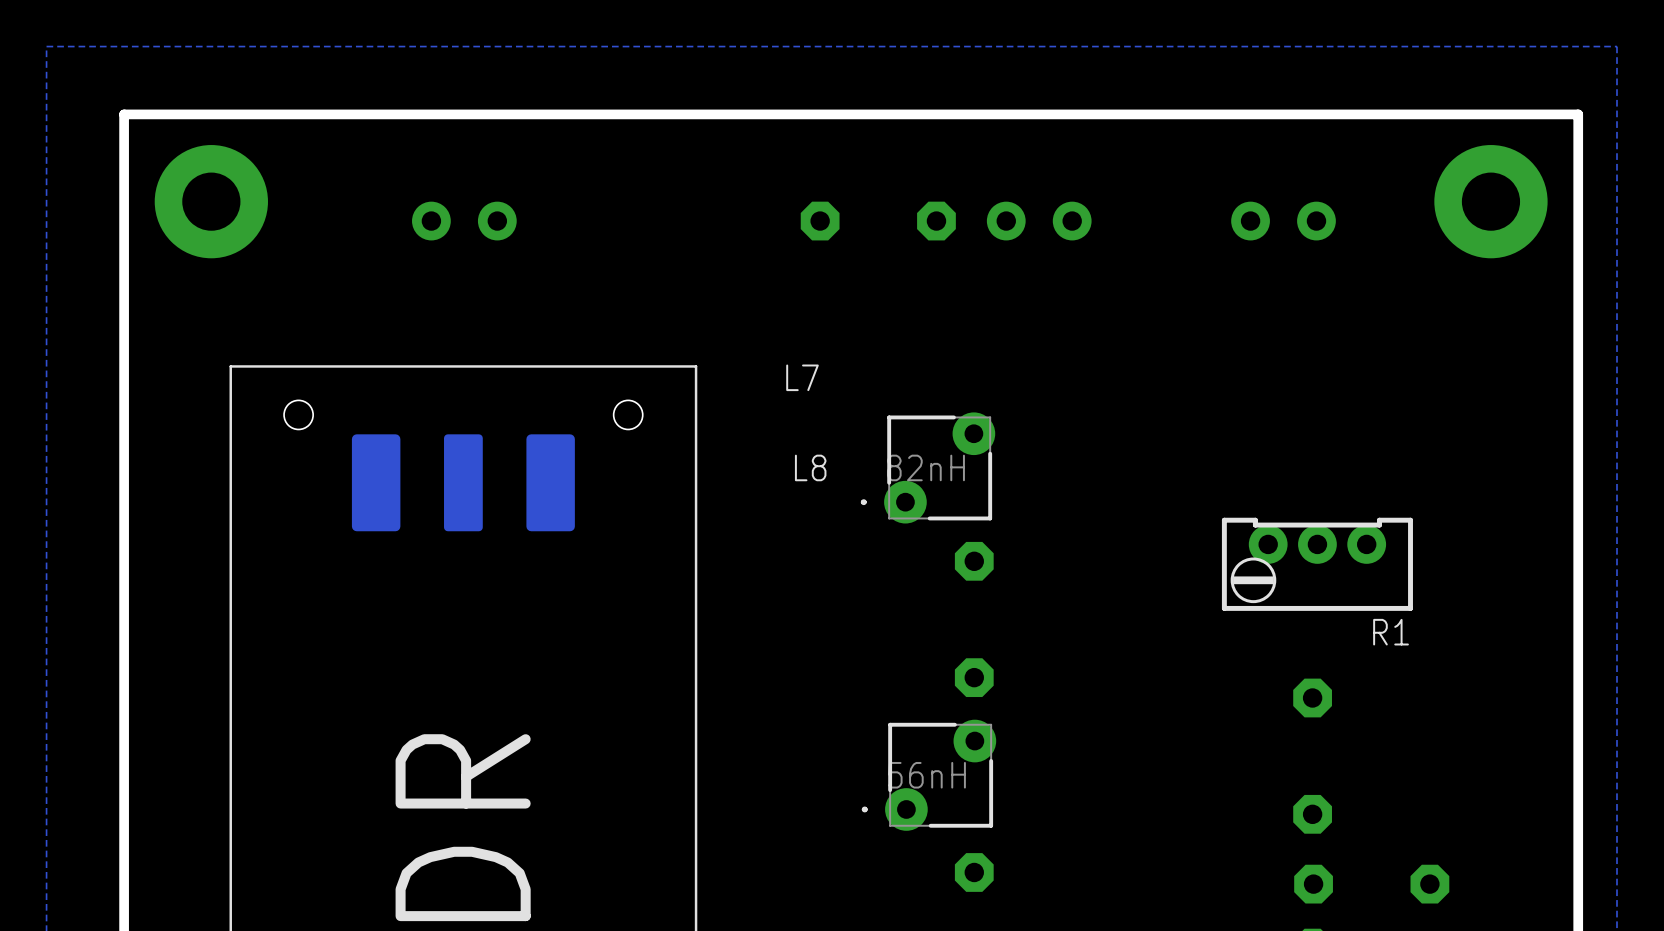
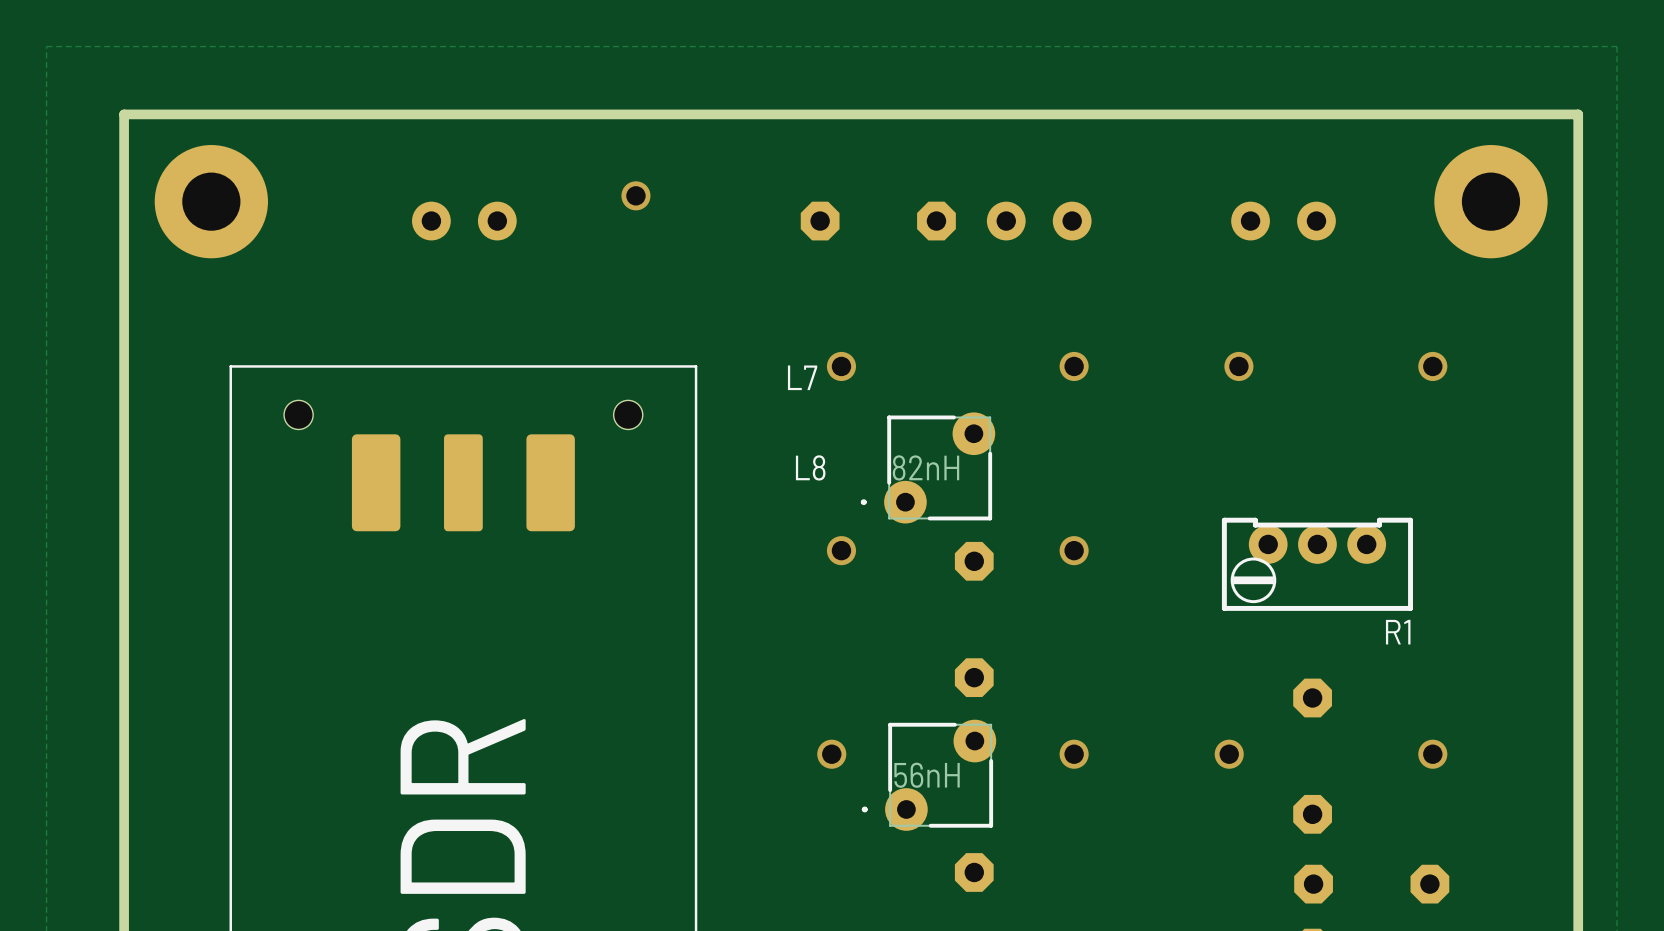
via: none -> (635, 195)
via: none -> (841, 366)
via: none -> (1074, 366)
via: none -> (1238, 366)
via: none -> (1432, 366)
via: none -> (841, 550)
via: none -> (1074, 550)
via: none -> (831, 754)
via: none -> (1074, 754)
via: none -> (1229, 754)
via: none -> (1432, 754)

